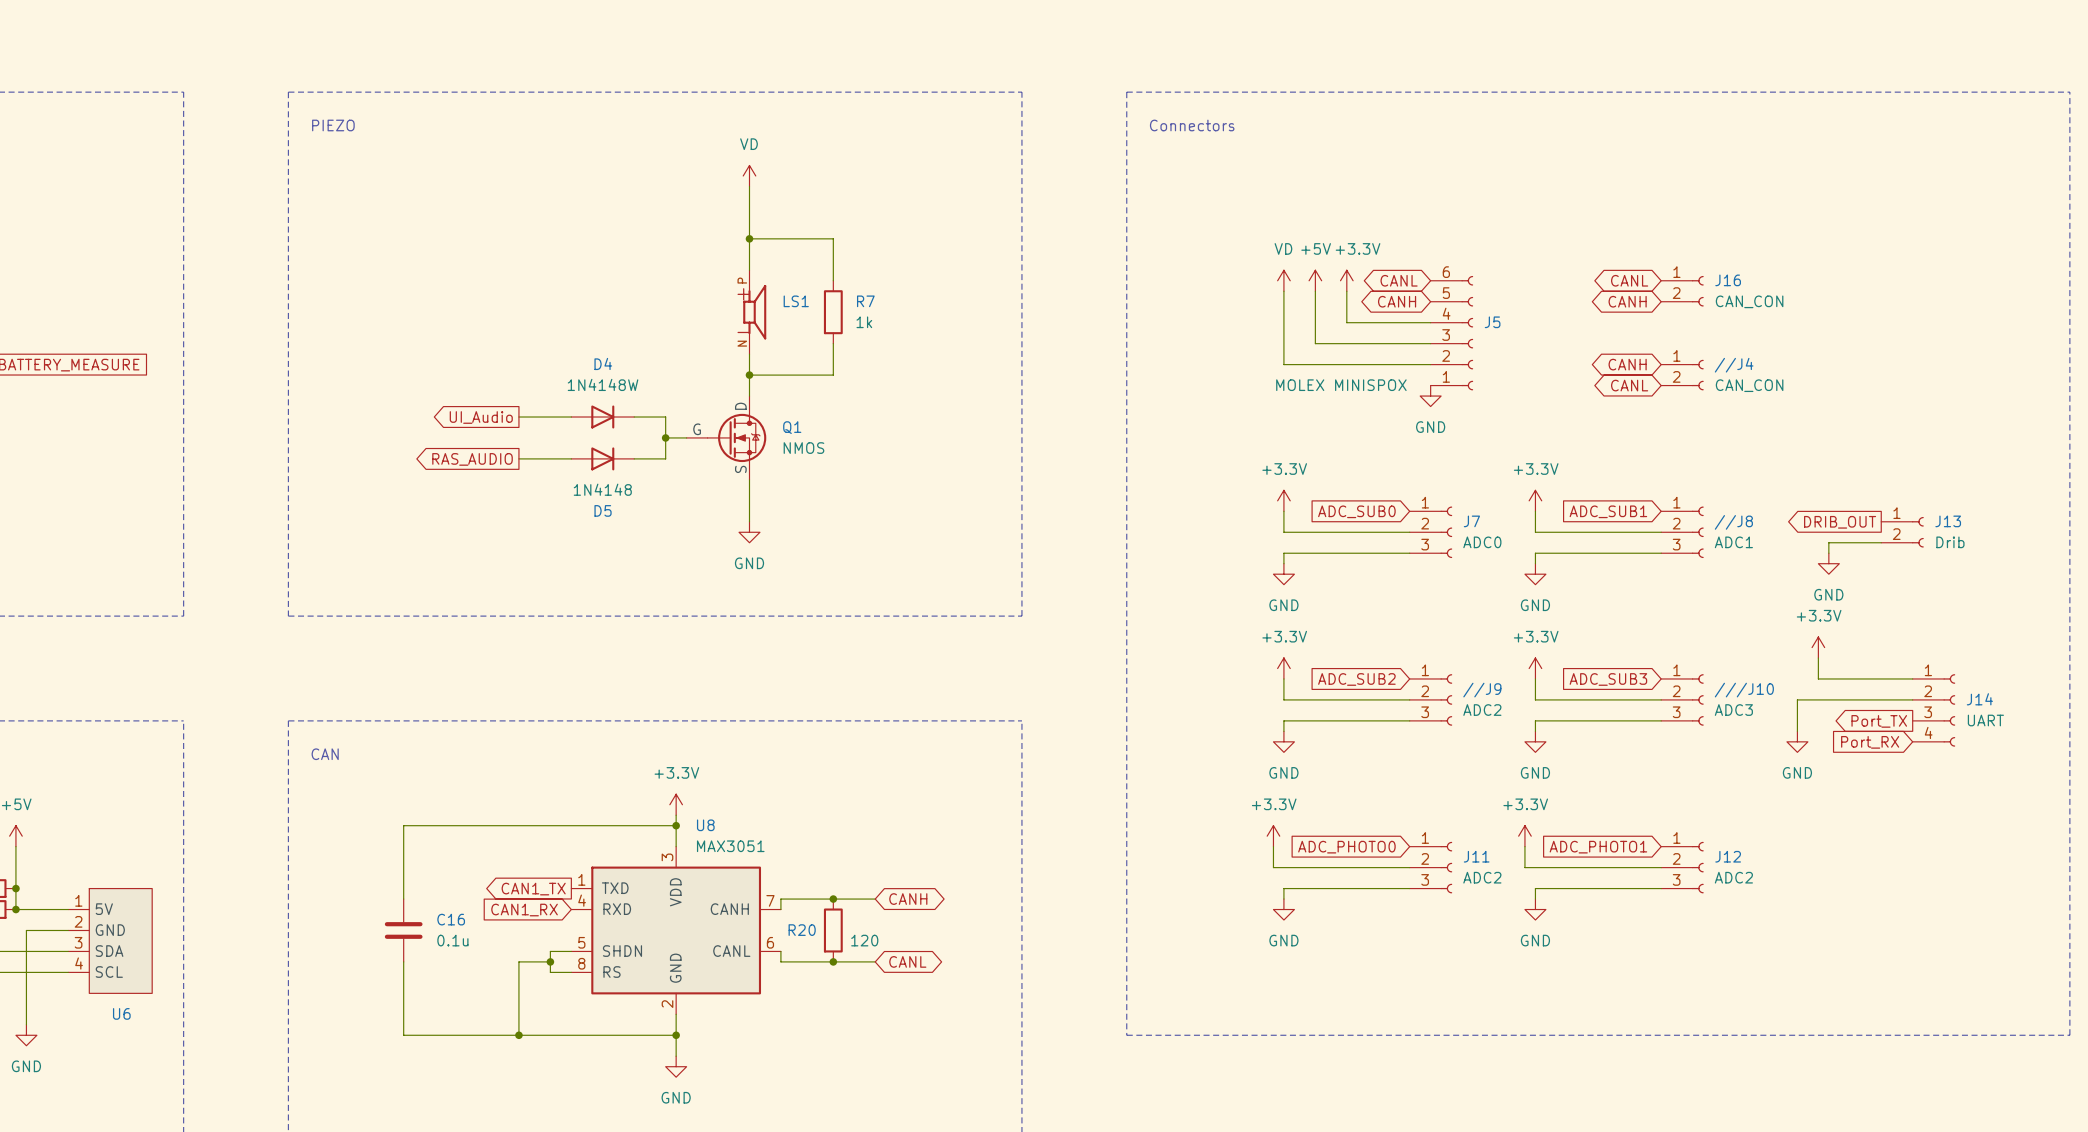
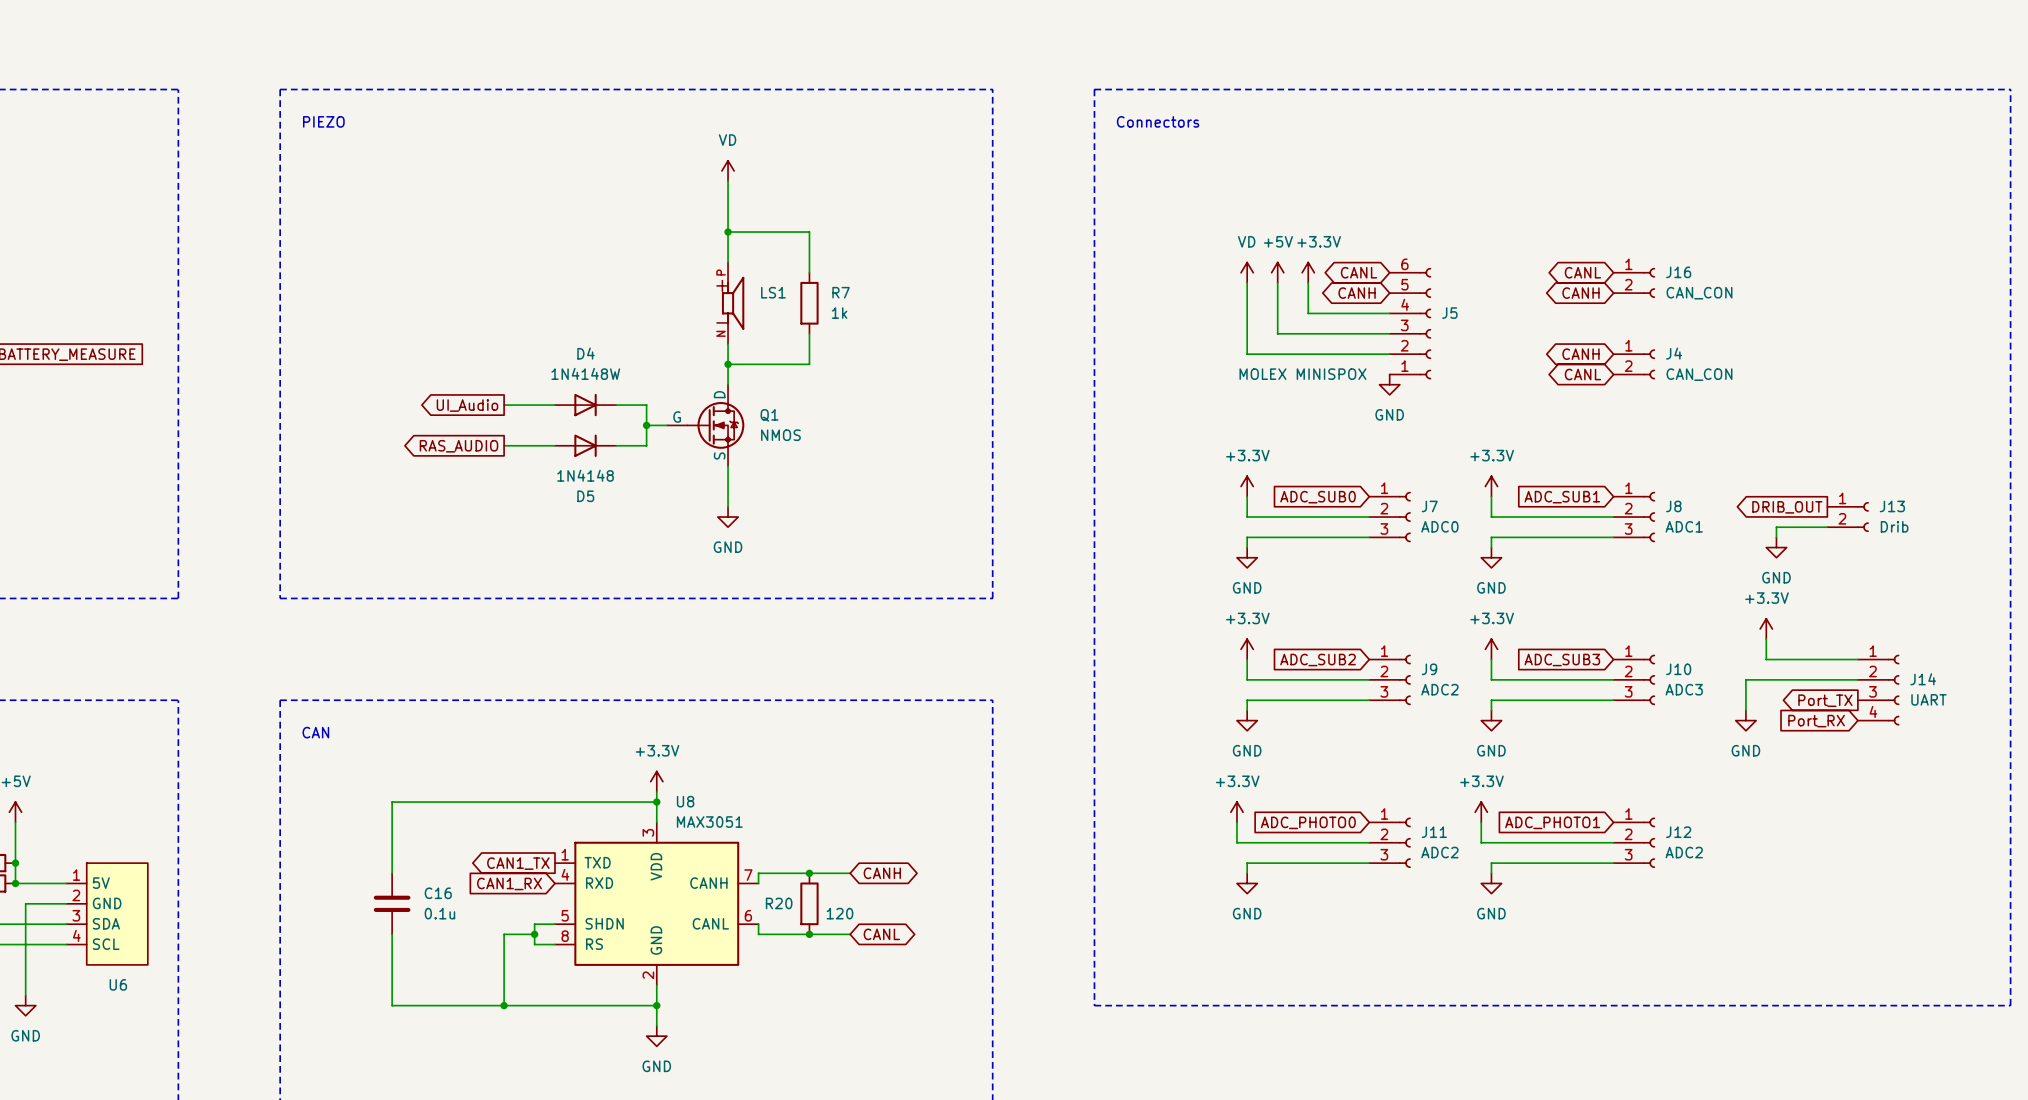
//J4 name: //J4 (1734, 365) -> J4 (1674, 353)
//J8 name: //J8 (1733, 522) -> J8 (1673, 506)
//J9 name: //J9 (1482, 690) -> J9 (1429, 669)
///J10 name: ///J10 (1744, 690) -> J10 (1678, 669)

